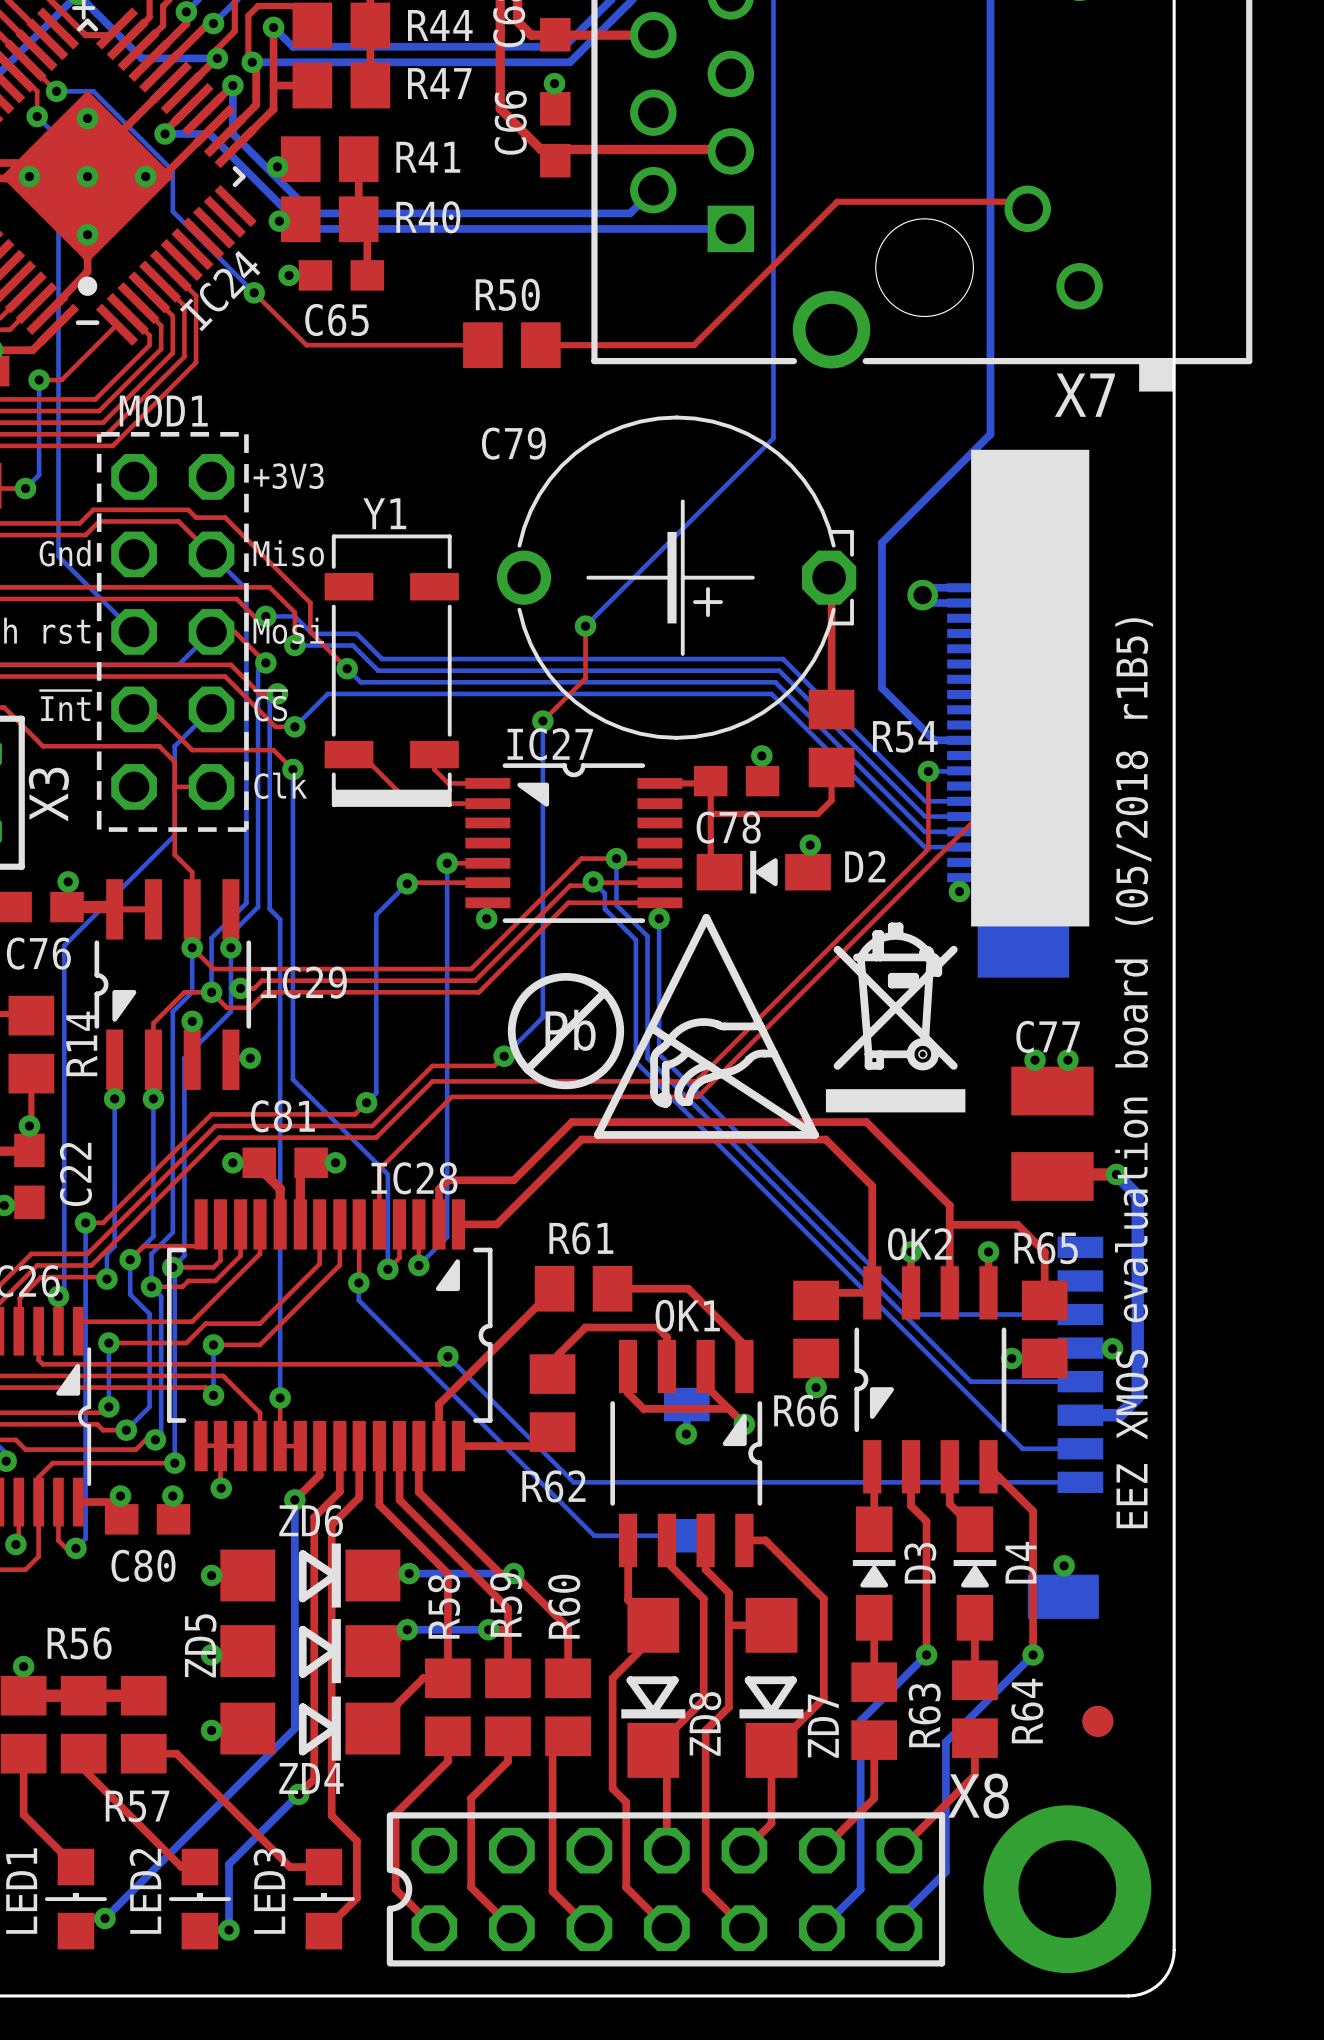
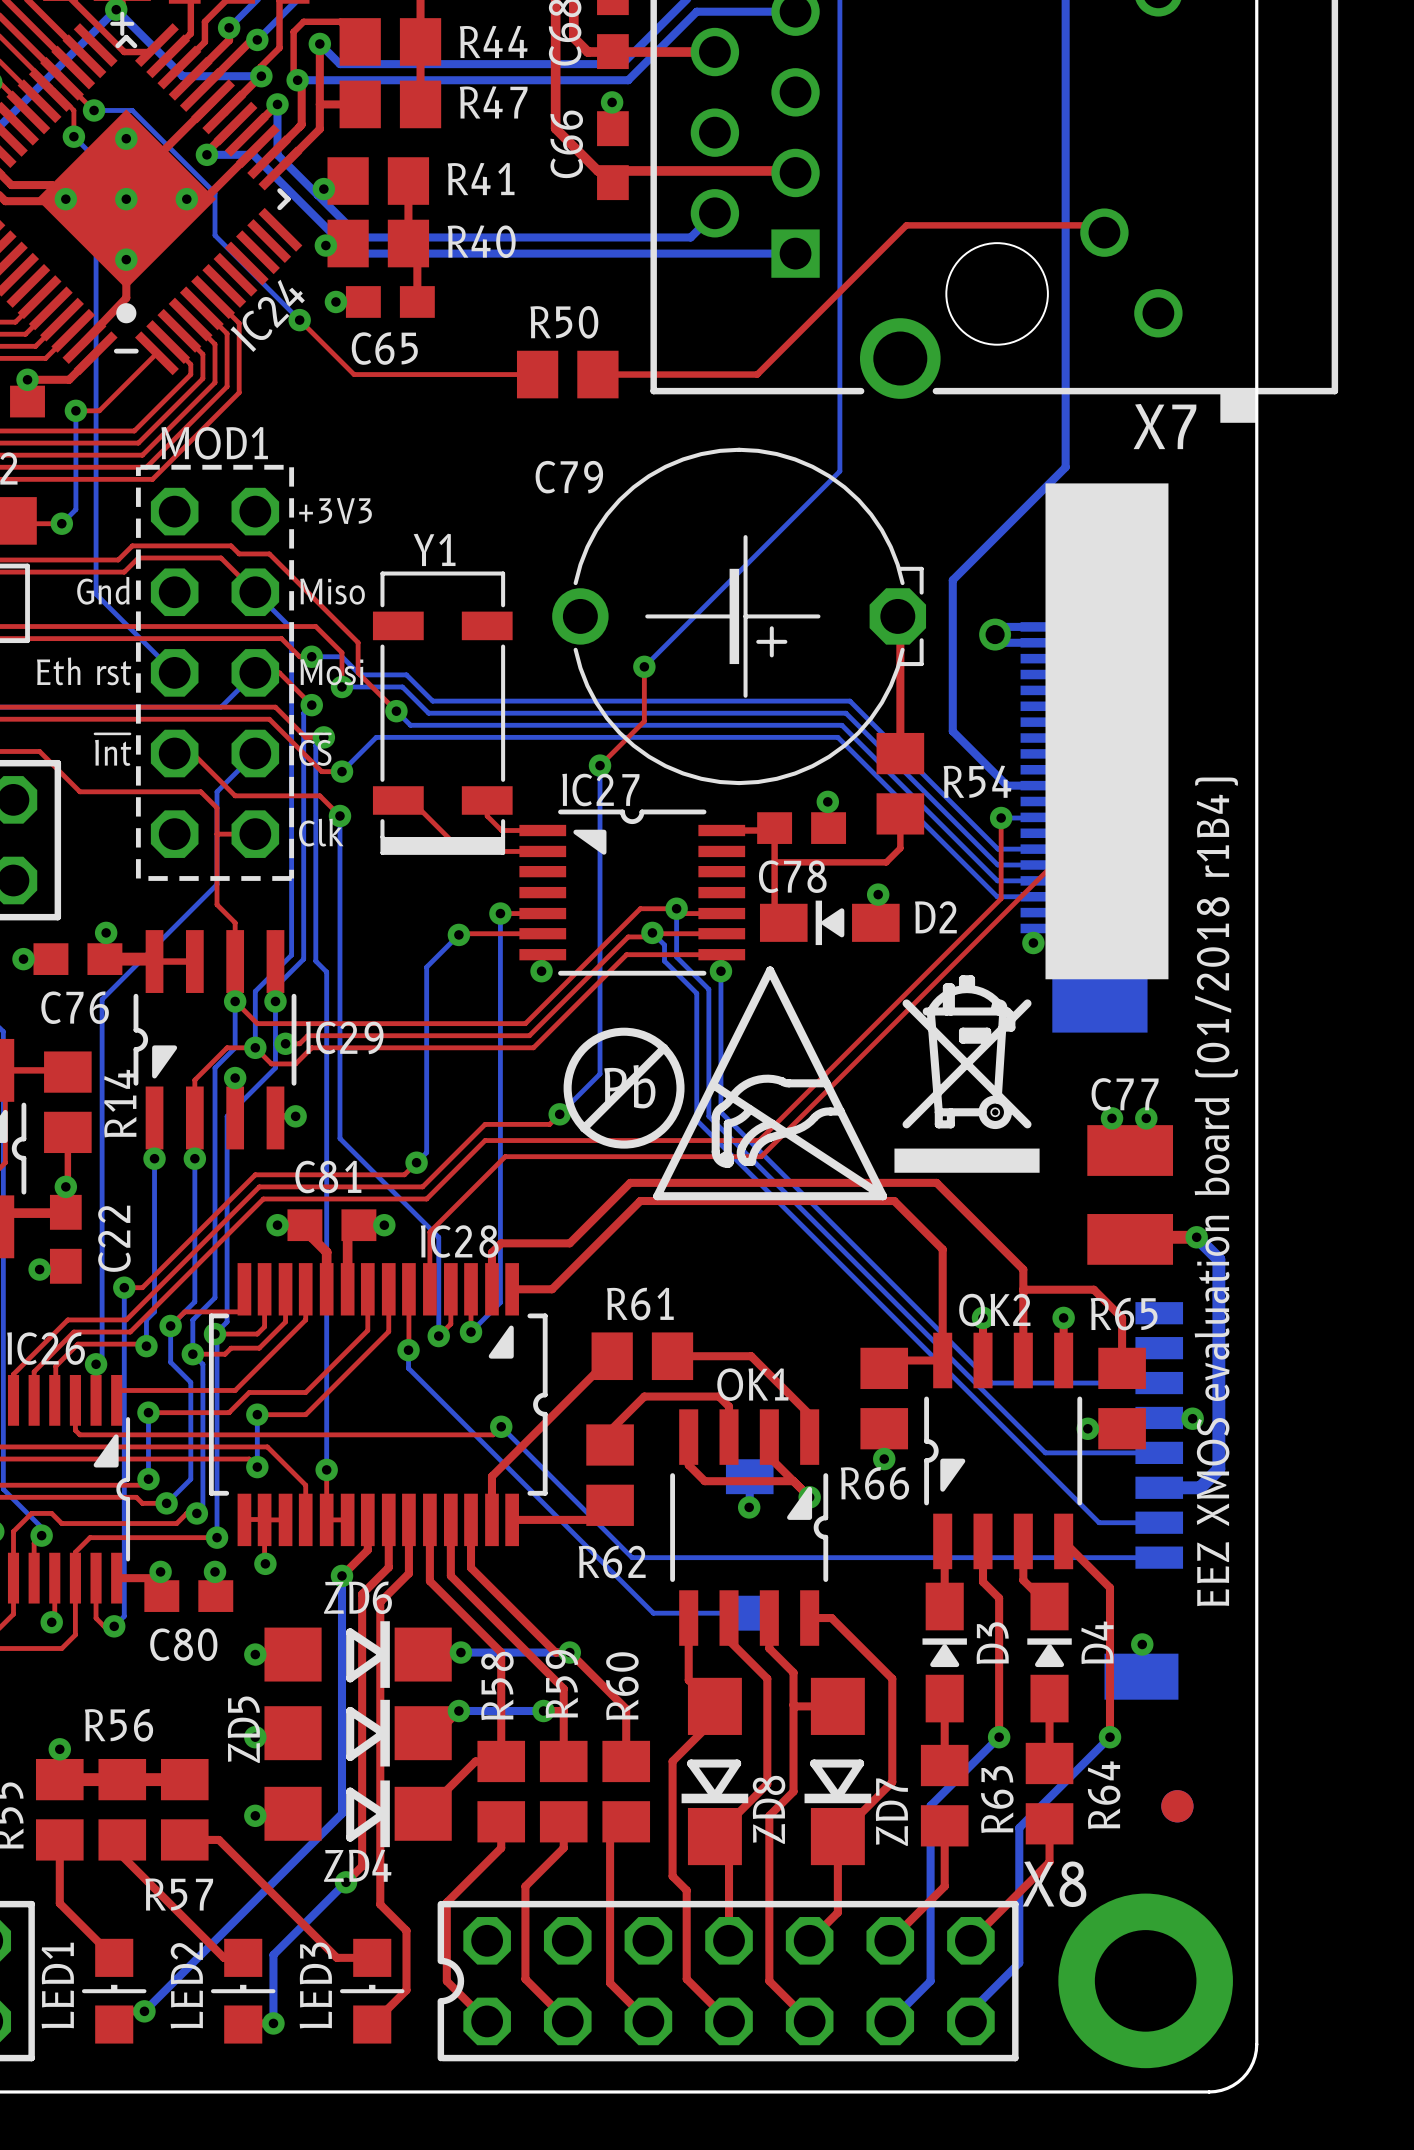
X3 name: X3 (48, 794) -> none
text: EEZ XMOS evaluation board (05/2018 r1B5) (1134, 1073) -> EEZ XMOS evaluation board (01/2018 r1B4) (1216, 1191)

